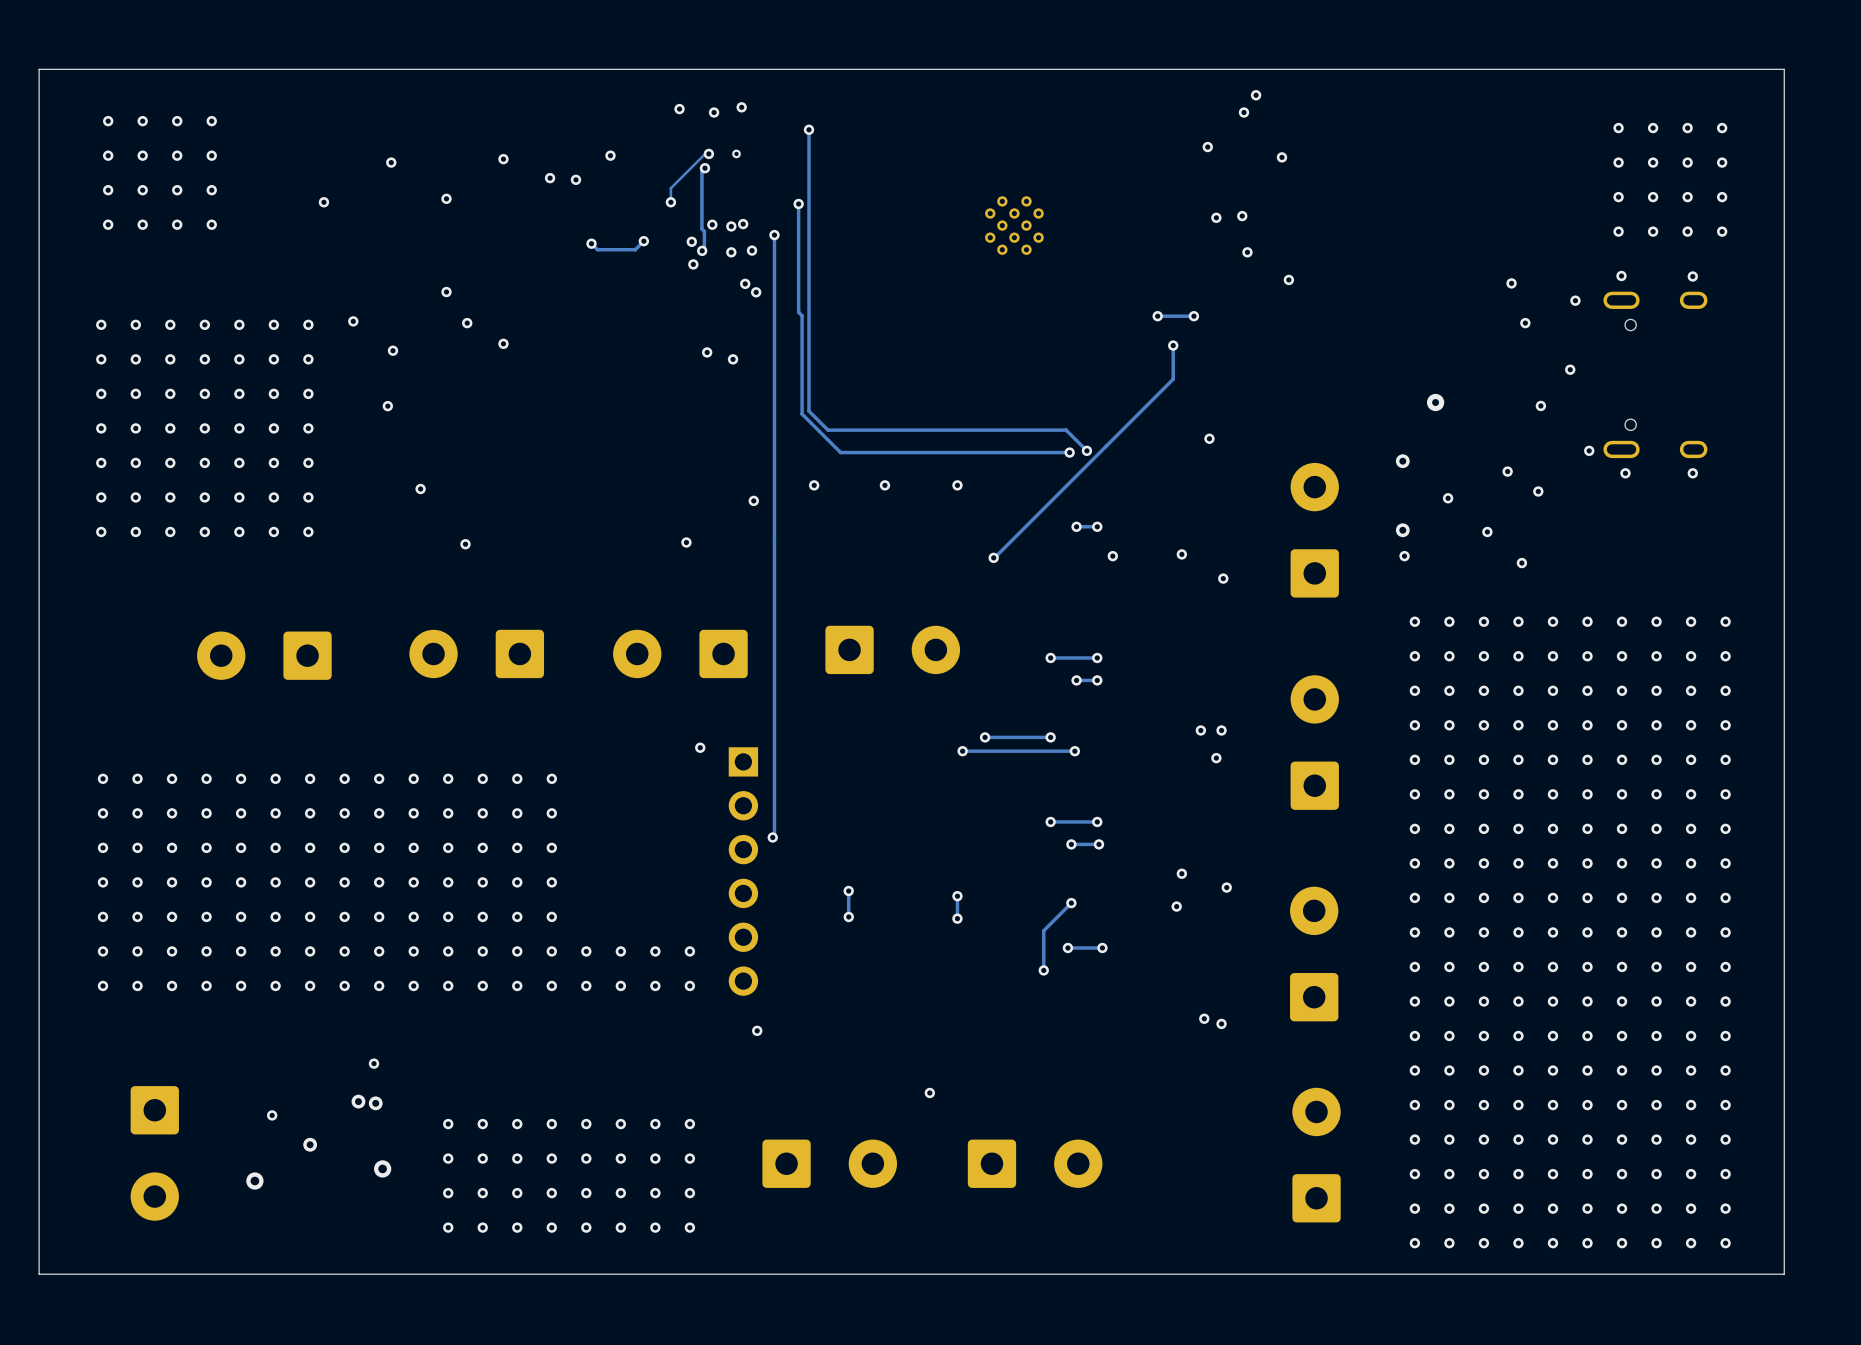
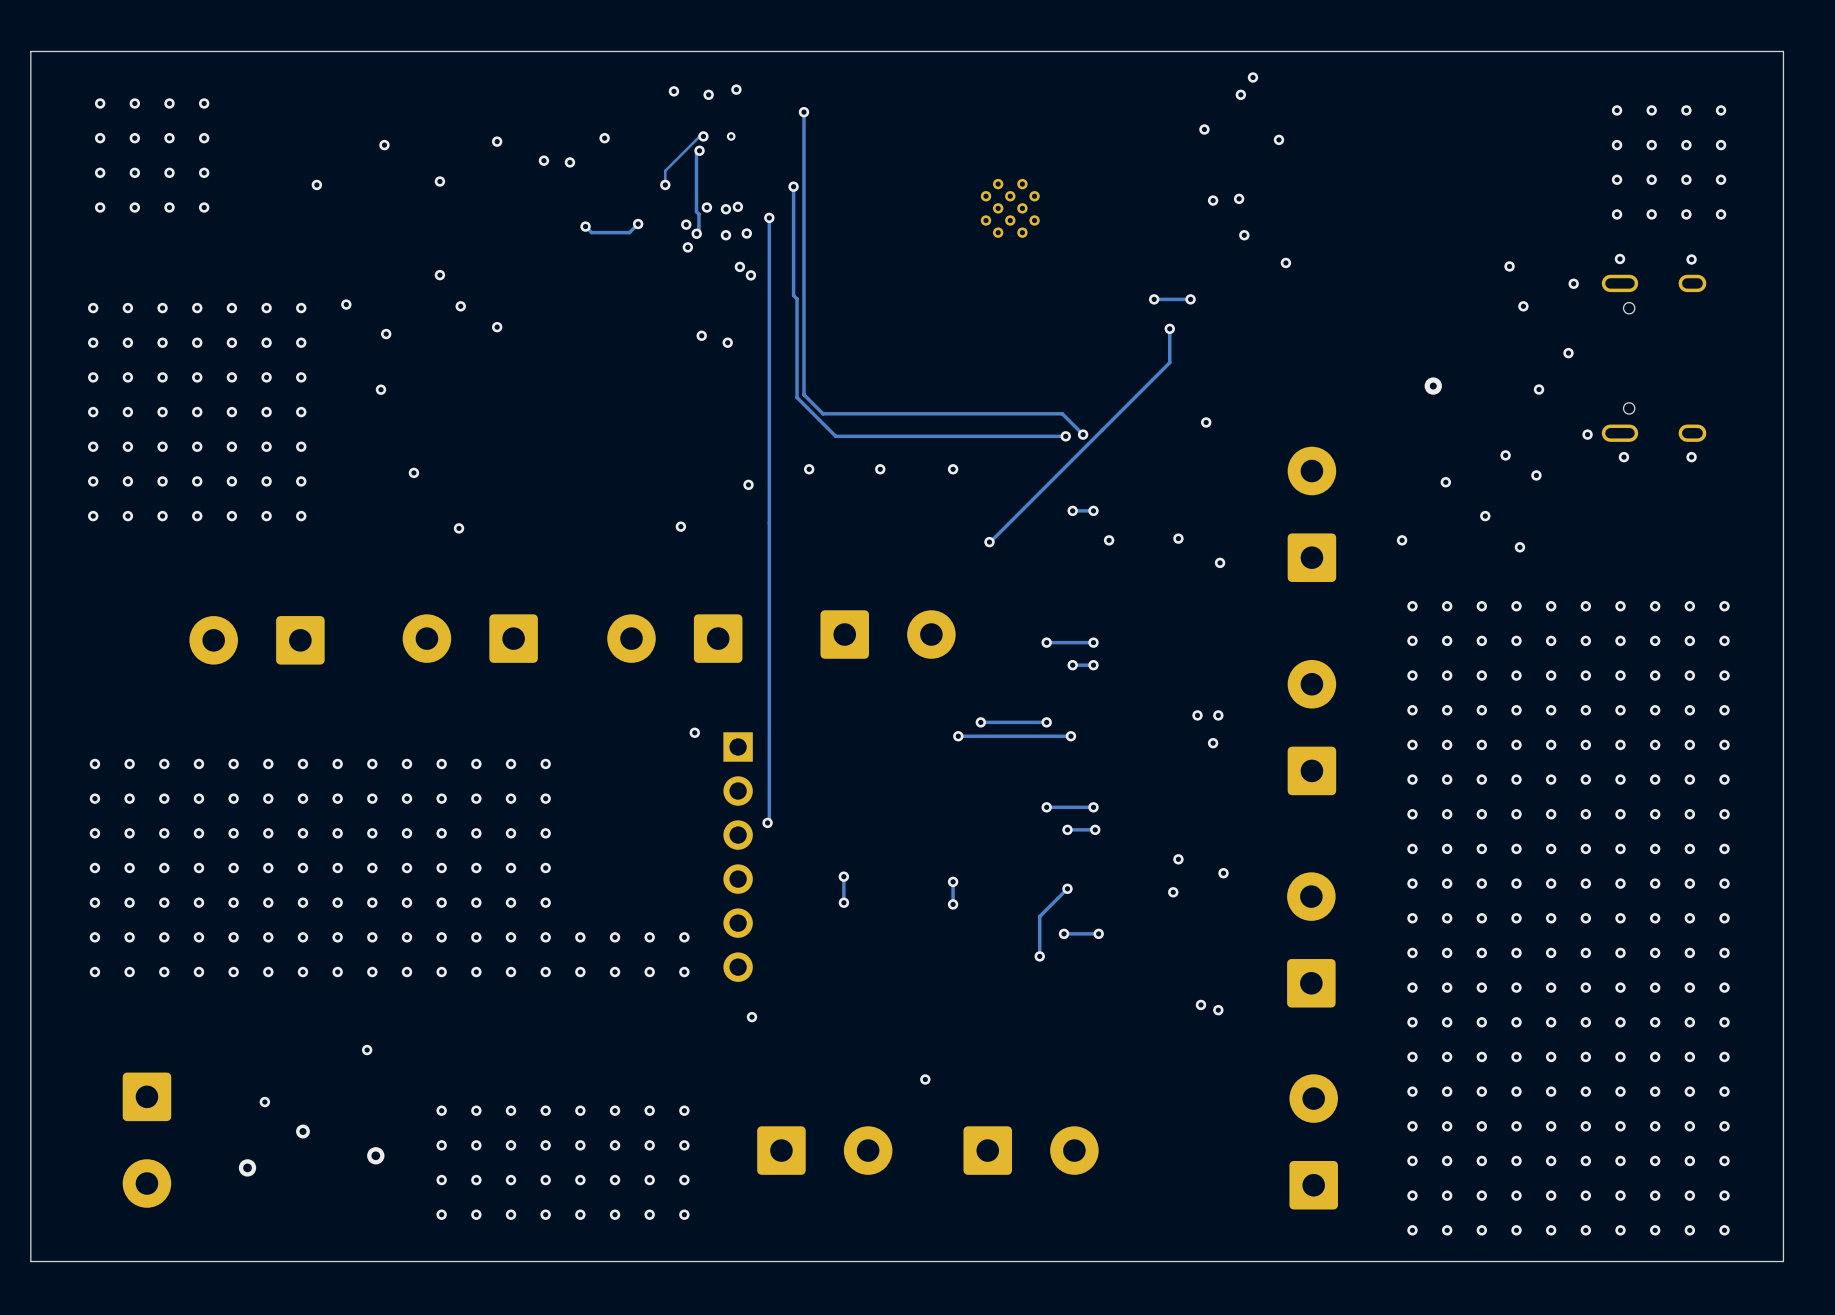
via: (1402, 461) -> none
via: (1402, 530) -> none
via: (358, 1101) -> none
via: (375, 1103) -> none

